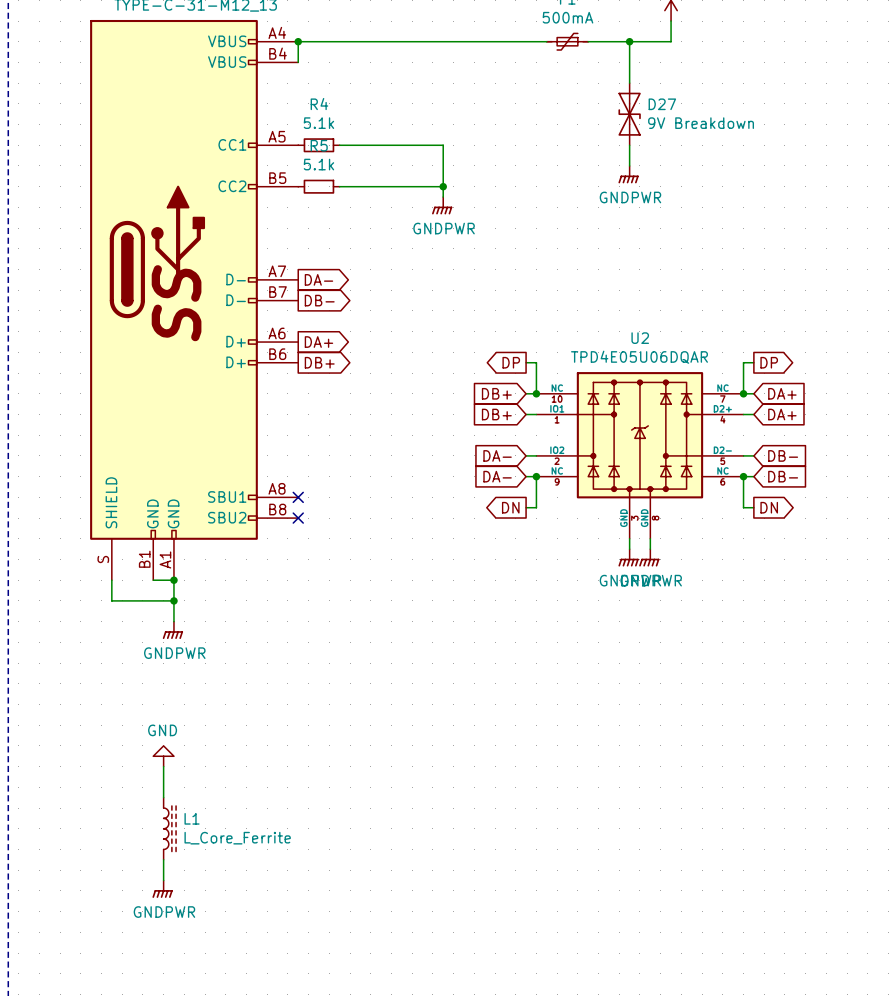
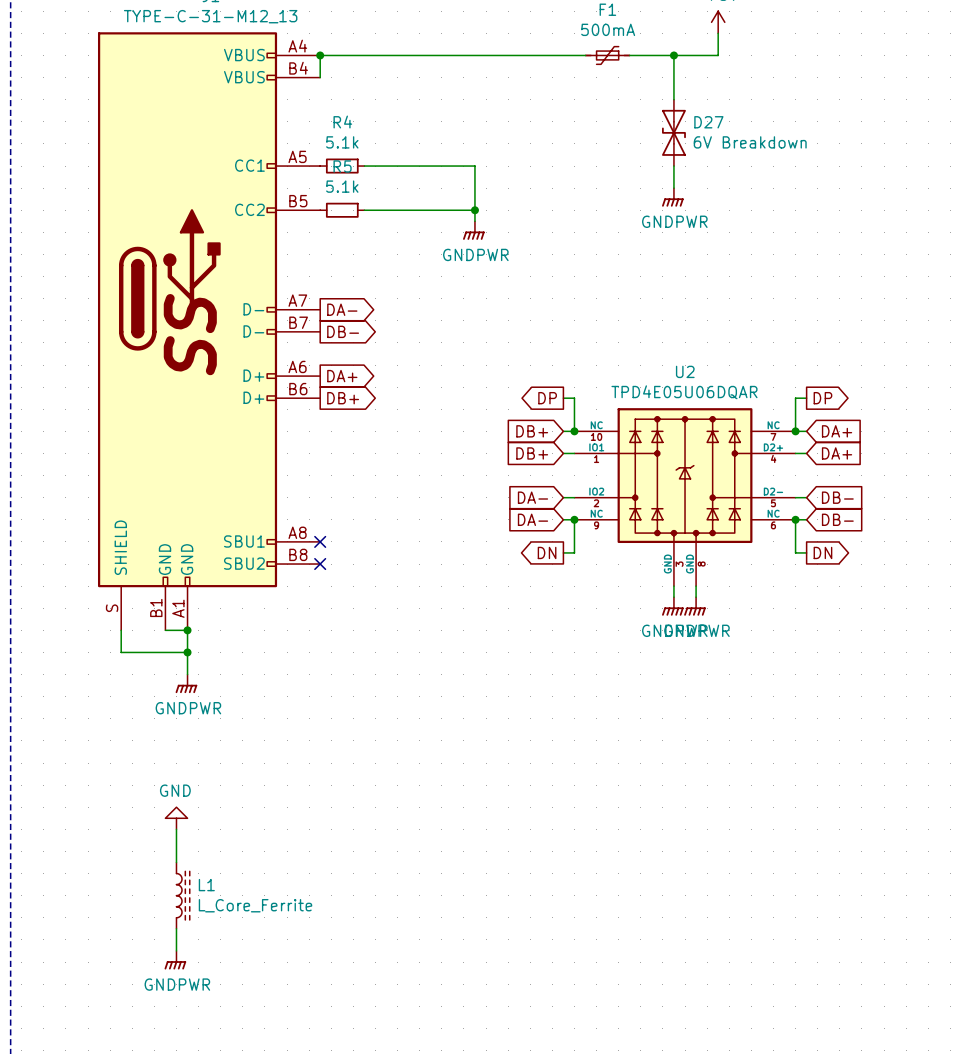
D27 value: 9V Breakdown (701, 123) -> 6V Breakdown (750, 142)

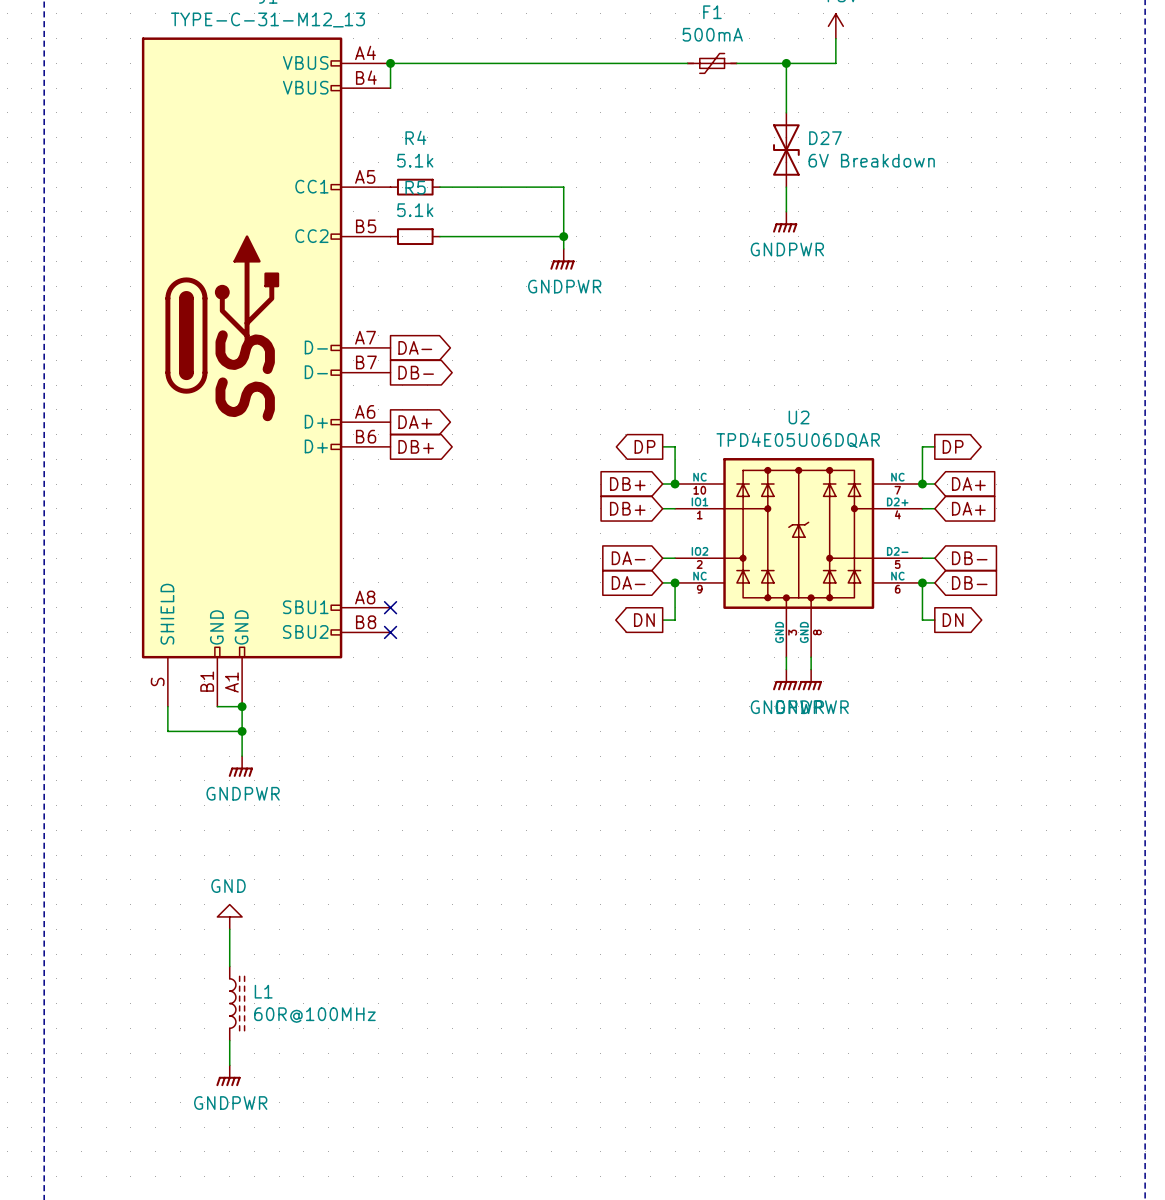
L1 value: L_Core_Ferrite (255, 905) -> 60R@100MHz (314, 1015)

